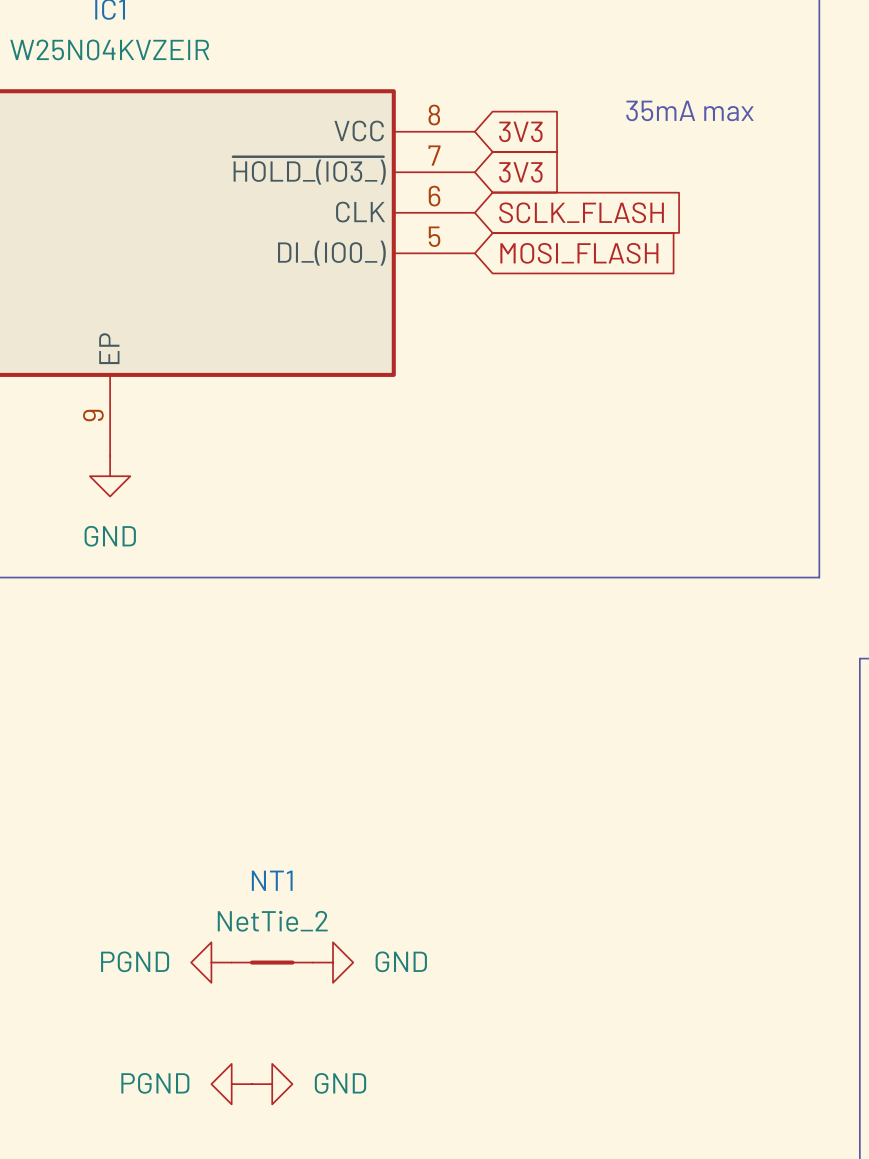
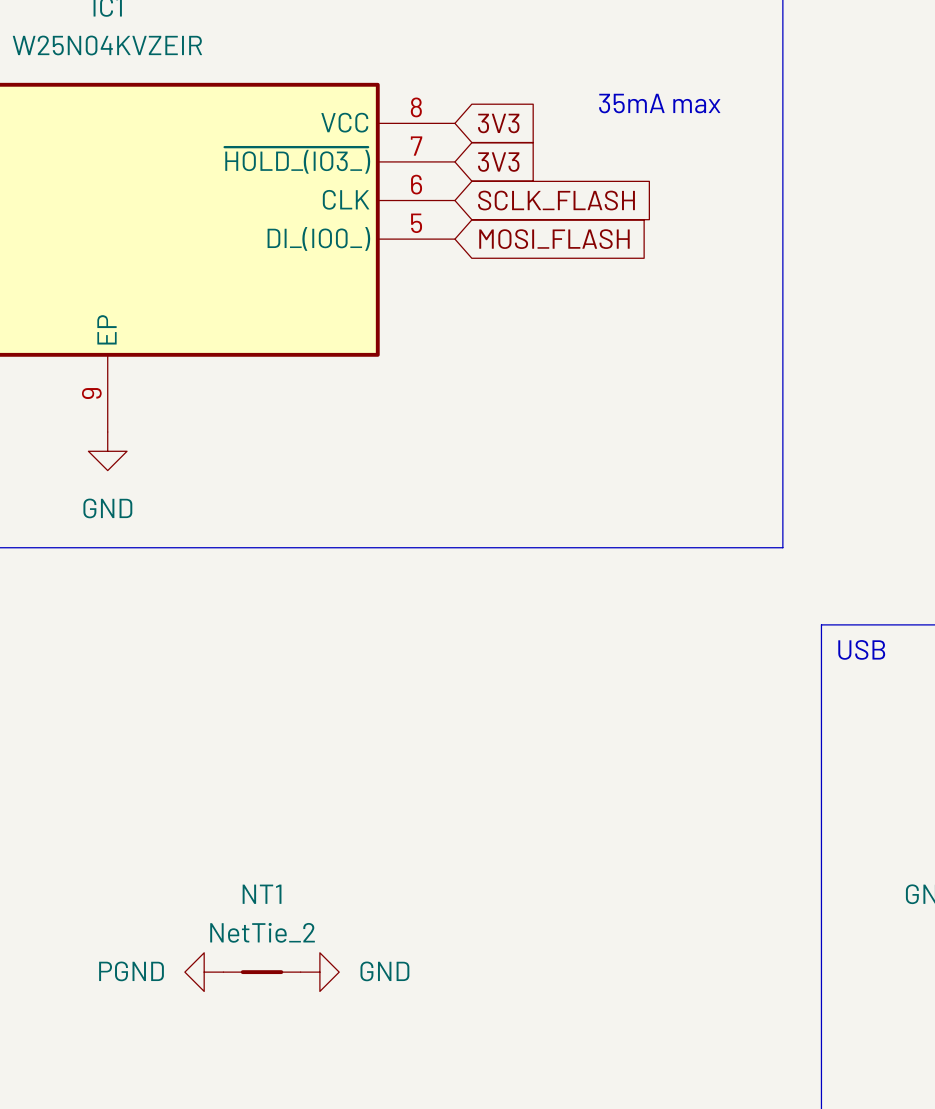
power symbol: PGND (211, 962) -> none
NT1 position: (272, 962) -> (262, 972)
power symbol: GND (333, 962) -> none
power symbol: none -> PGND (204, 972)
power symbol: none -> GND (319, 972)
power symbol: PGND (231, 1084) -> none
power symbol: GND (272, 1084) -> none

